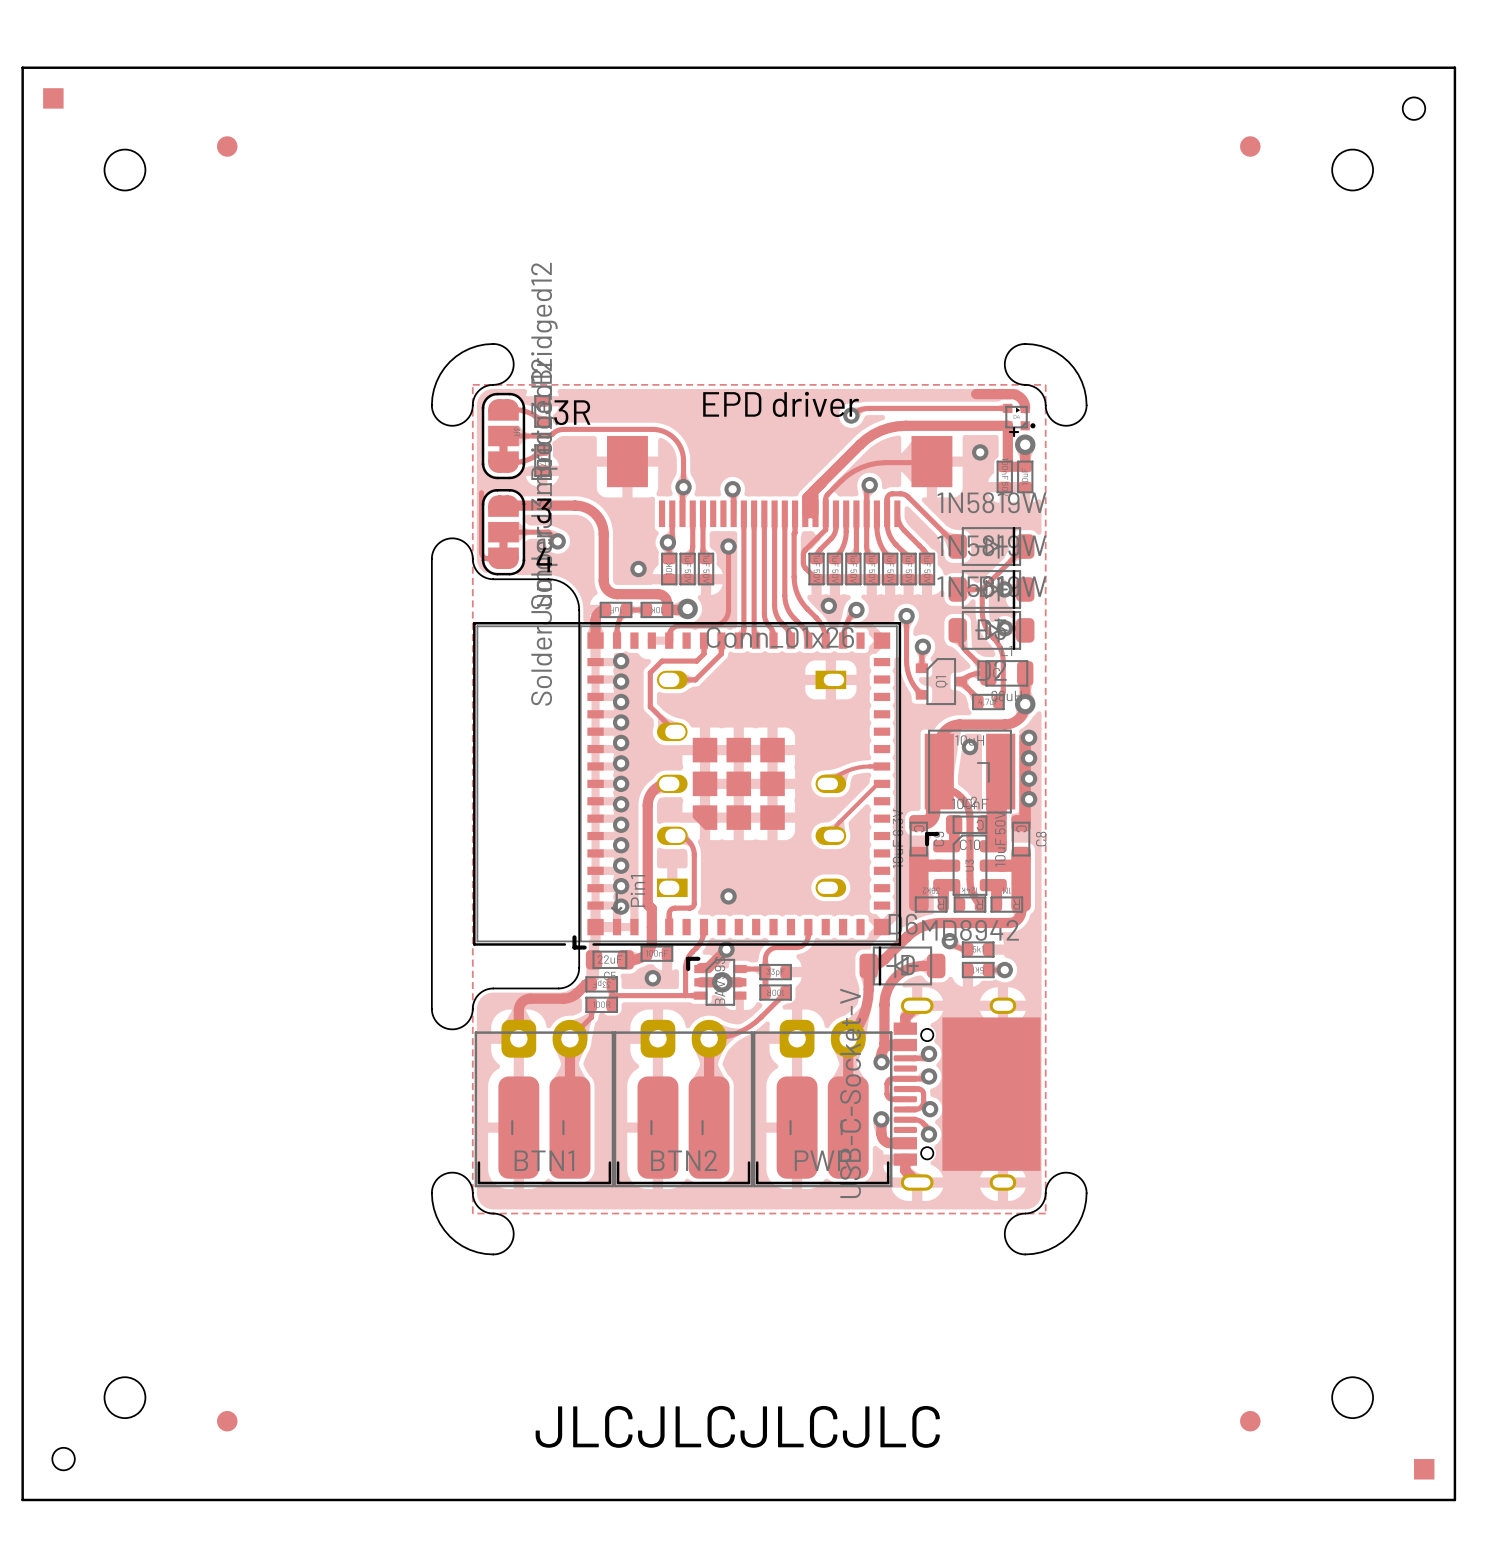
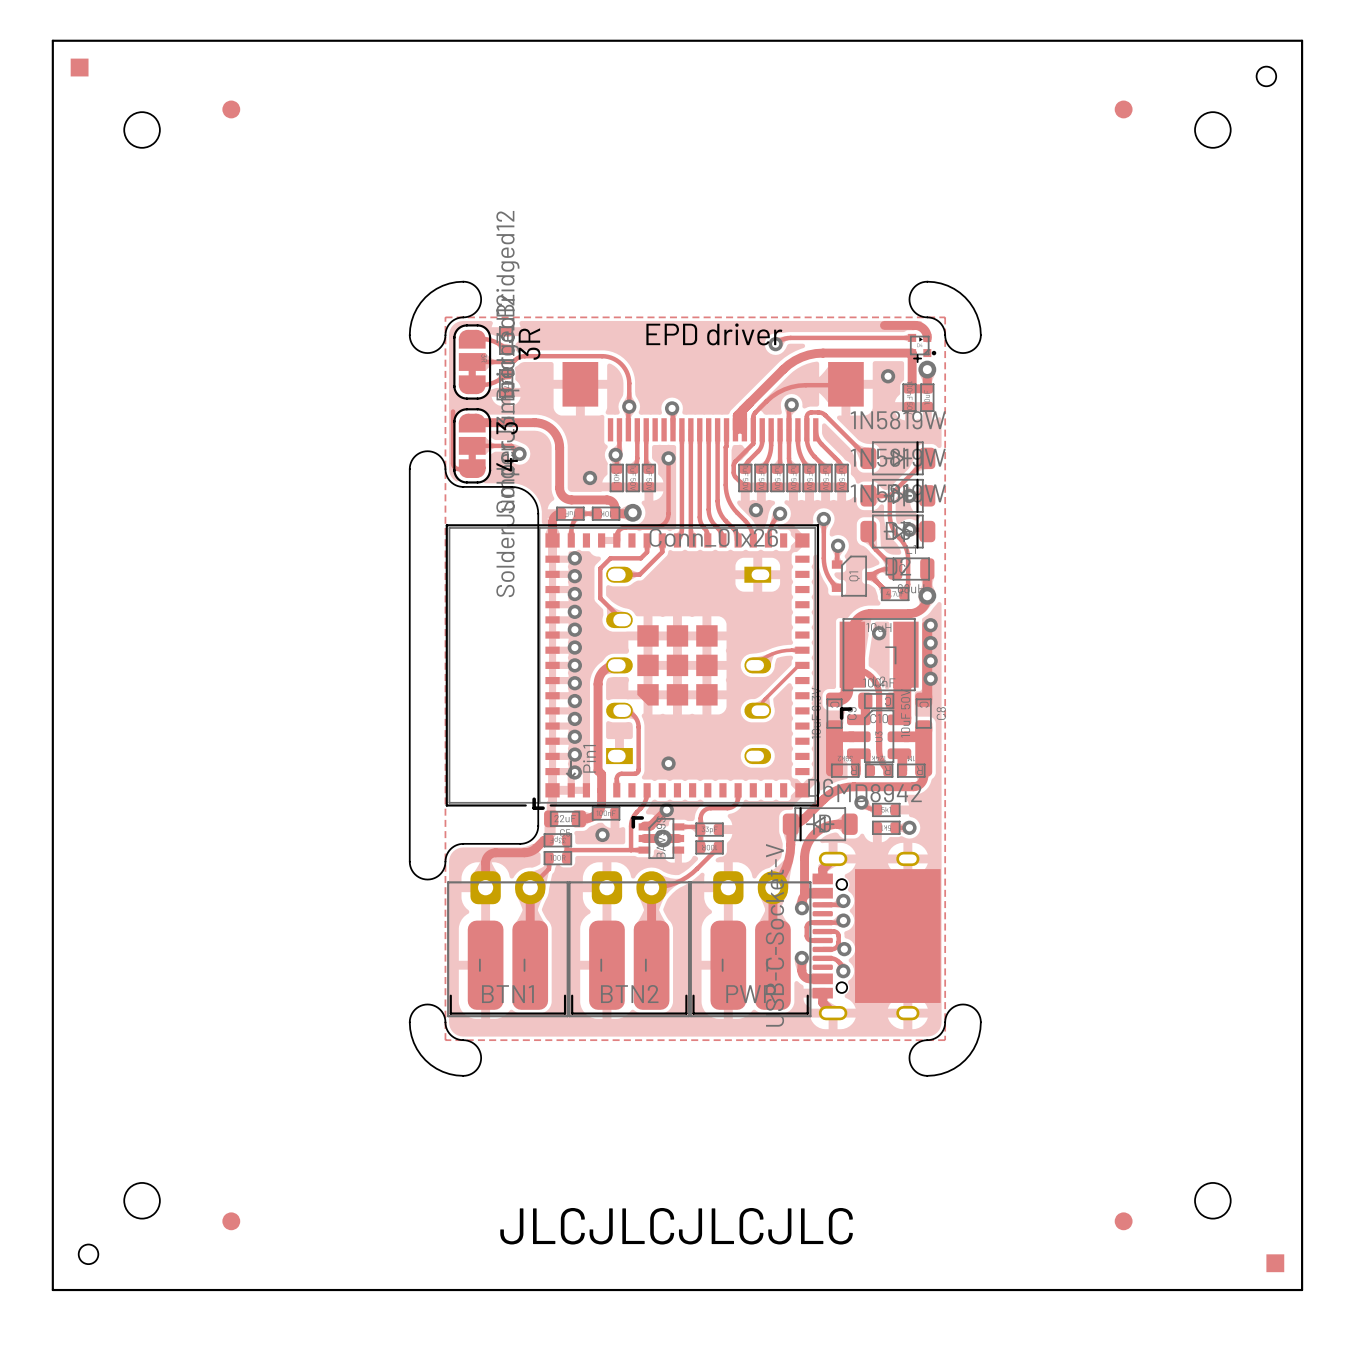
text rotation: 0° (572, 412) -> 90° counterclockwise (529, 344)
text rotation: 0° (544, 510) -> 90° counterclockwise (507, 428)
text rotation: 0° (544, 559) -> 90° counterclockwise (507, 464)

